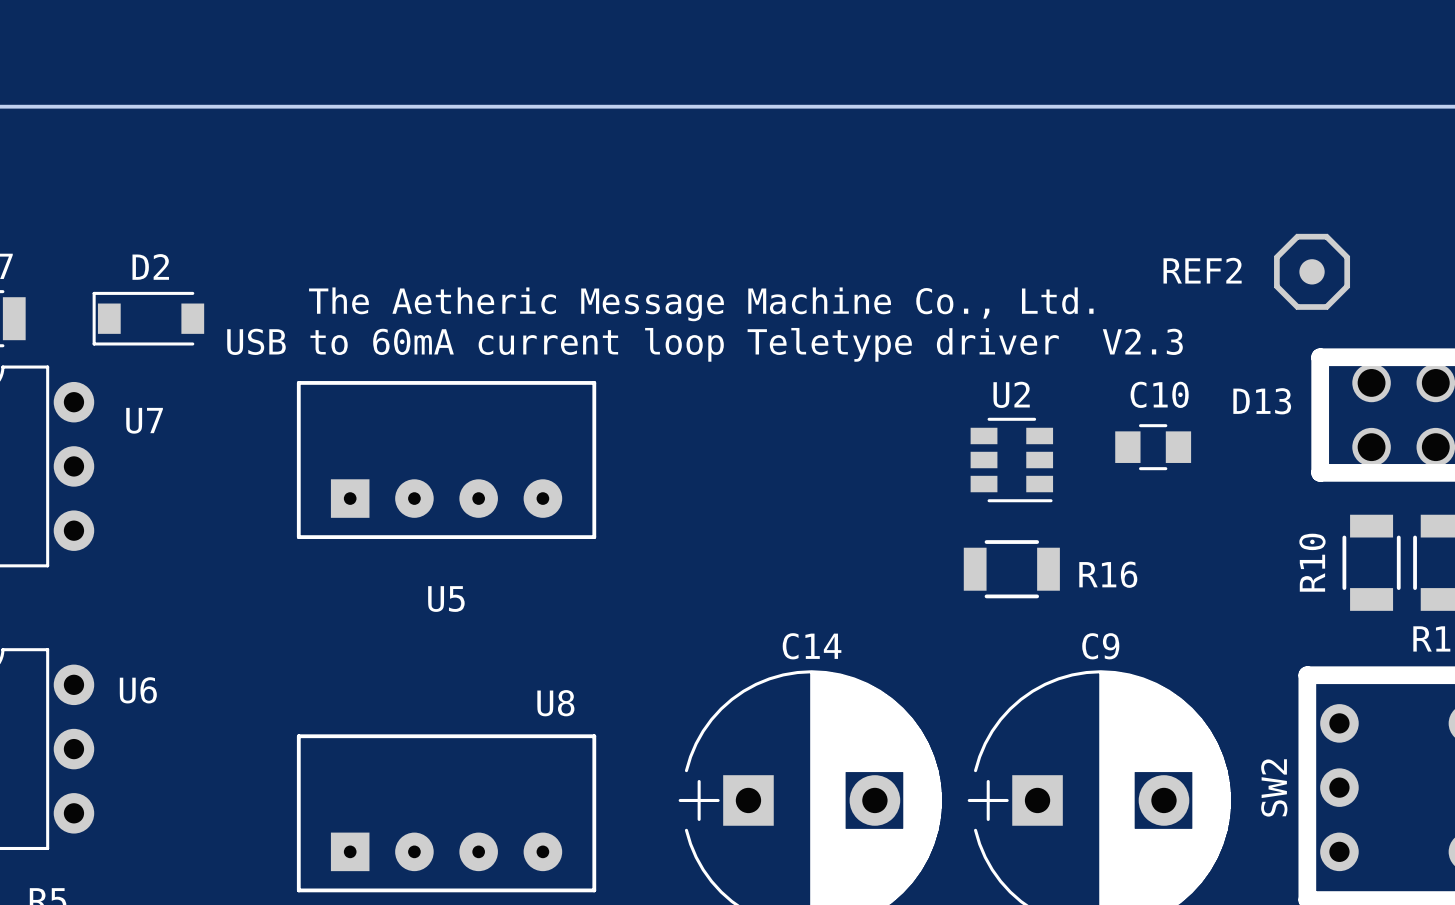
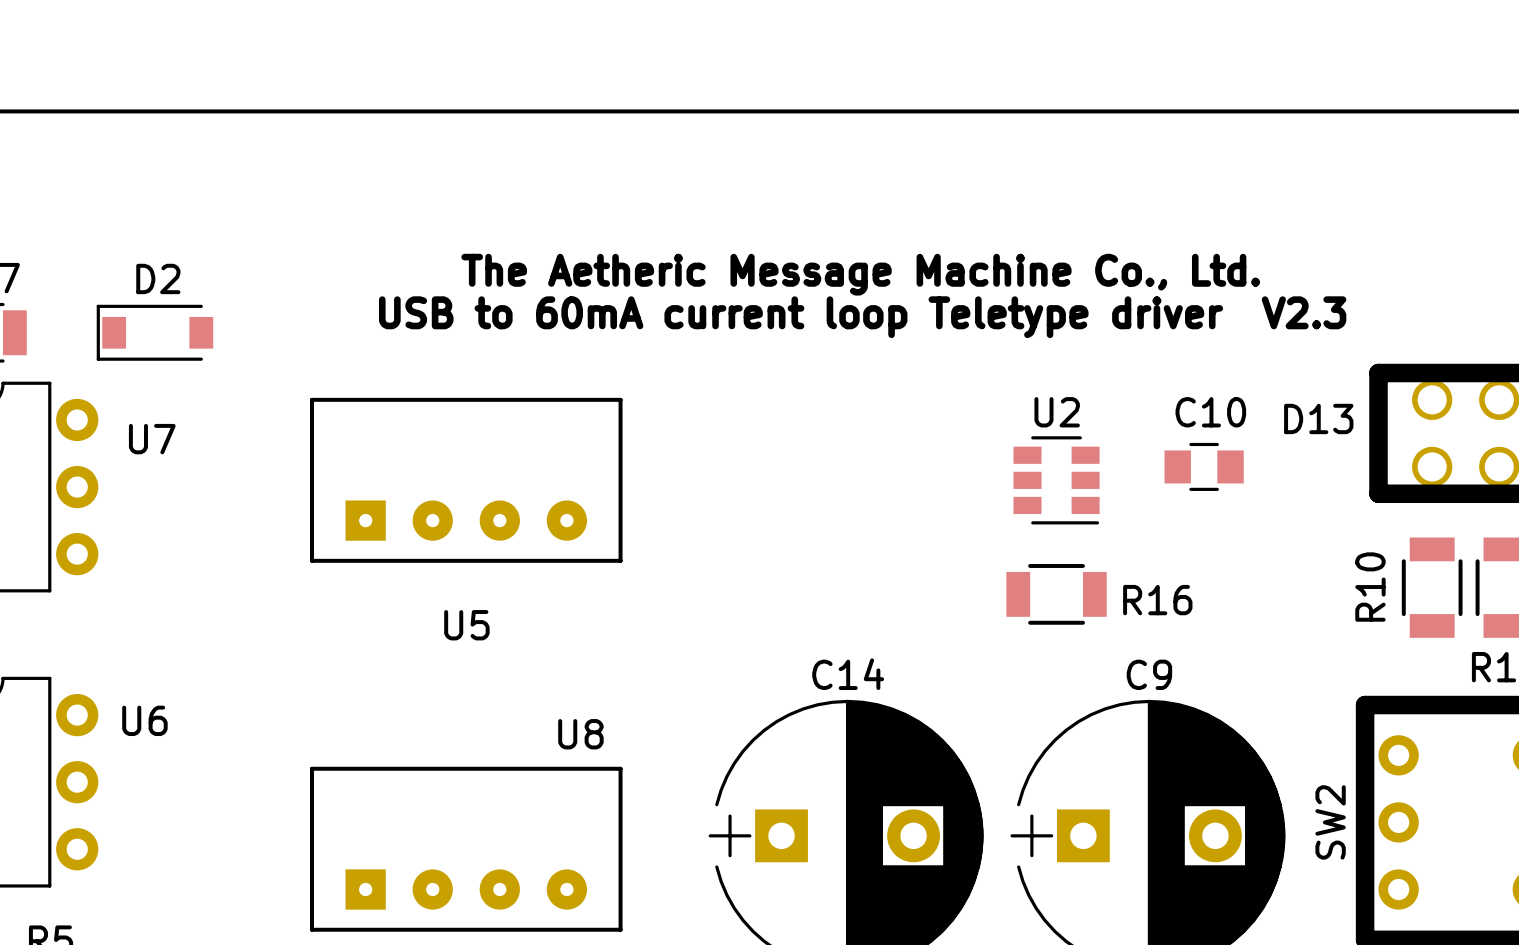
REF2: (1312, 271) -> none
text position: The Aetheric Message Machine Co., Ltd. (701, 304) -> The Aetheric Message Machine Co., Ltd. (860, 274)
text position: USB to 60mA current loop Teletype driver V2.3 (705, 344) -> USB to 60mA current loop Teletype driver V2.3 (862, 317)

